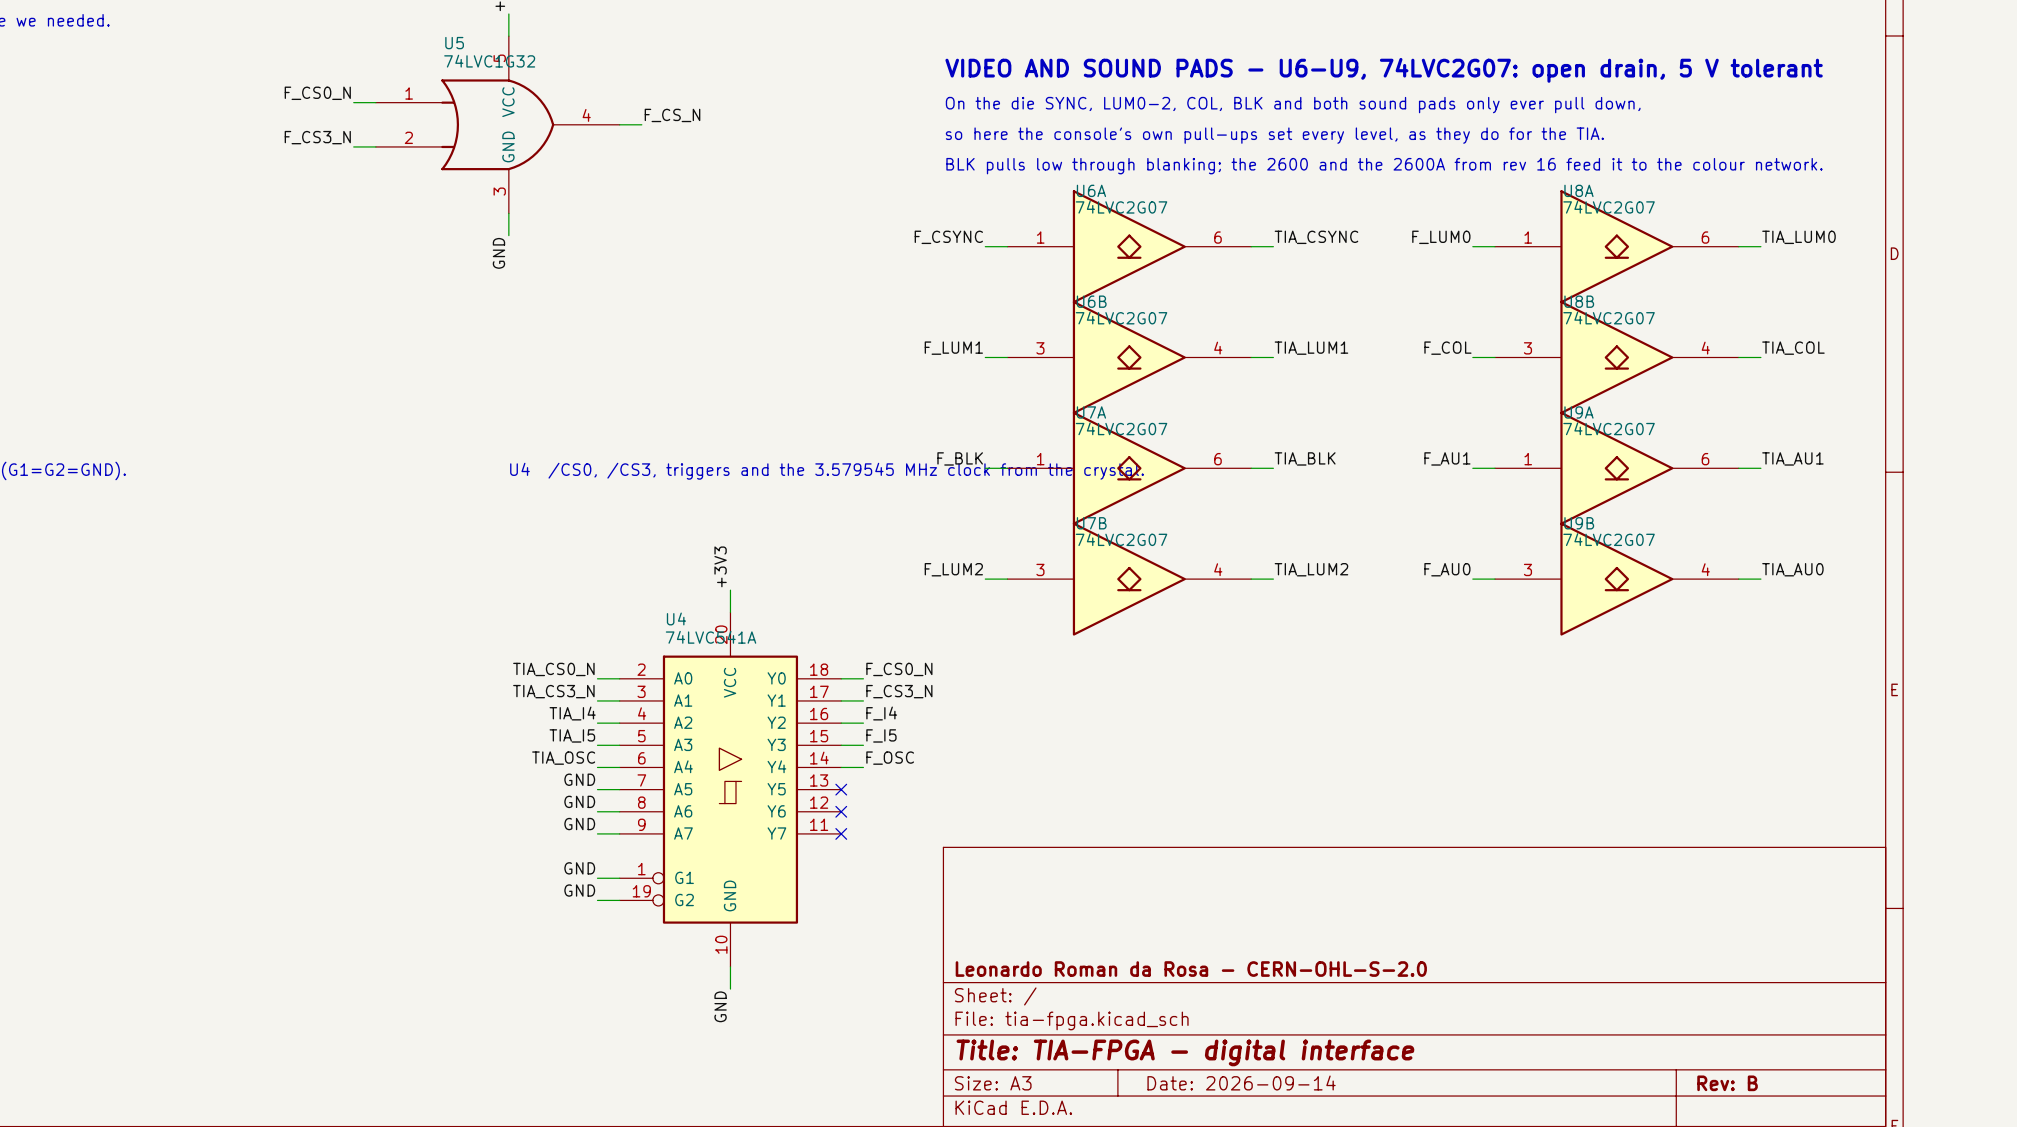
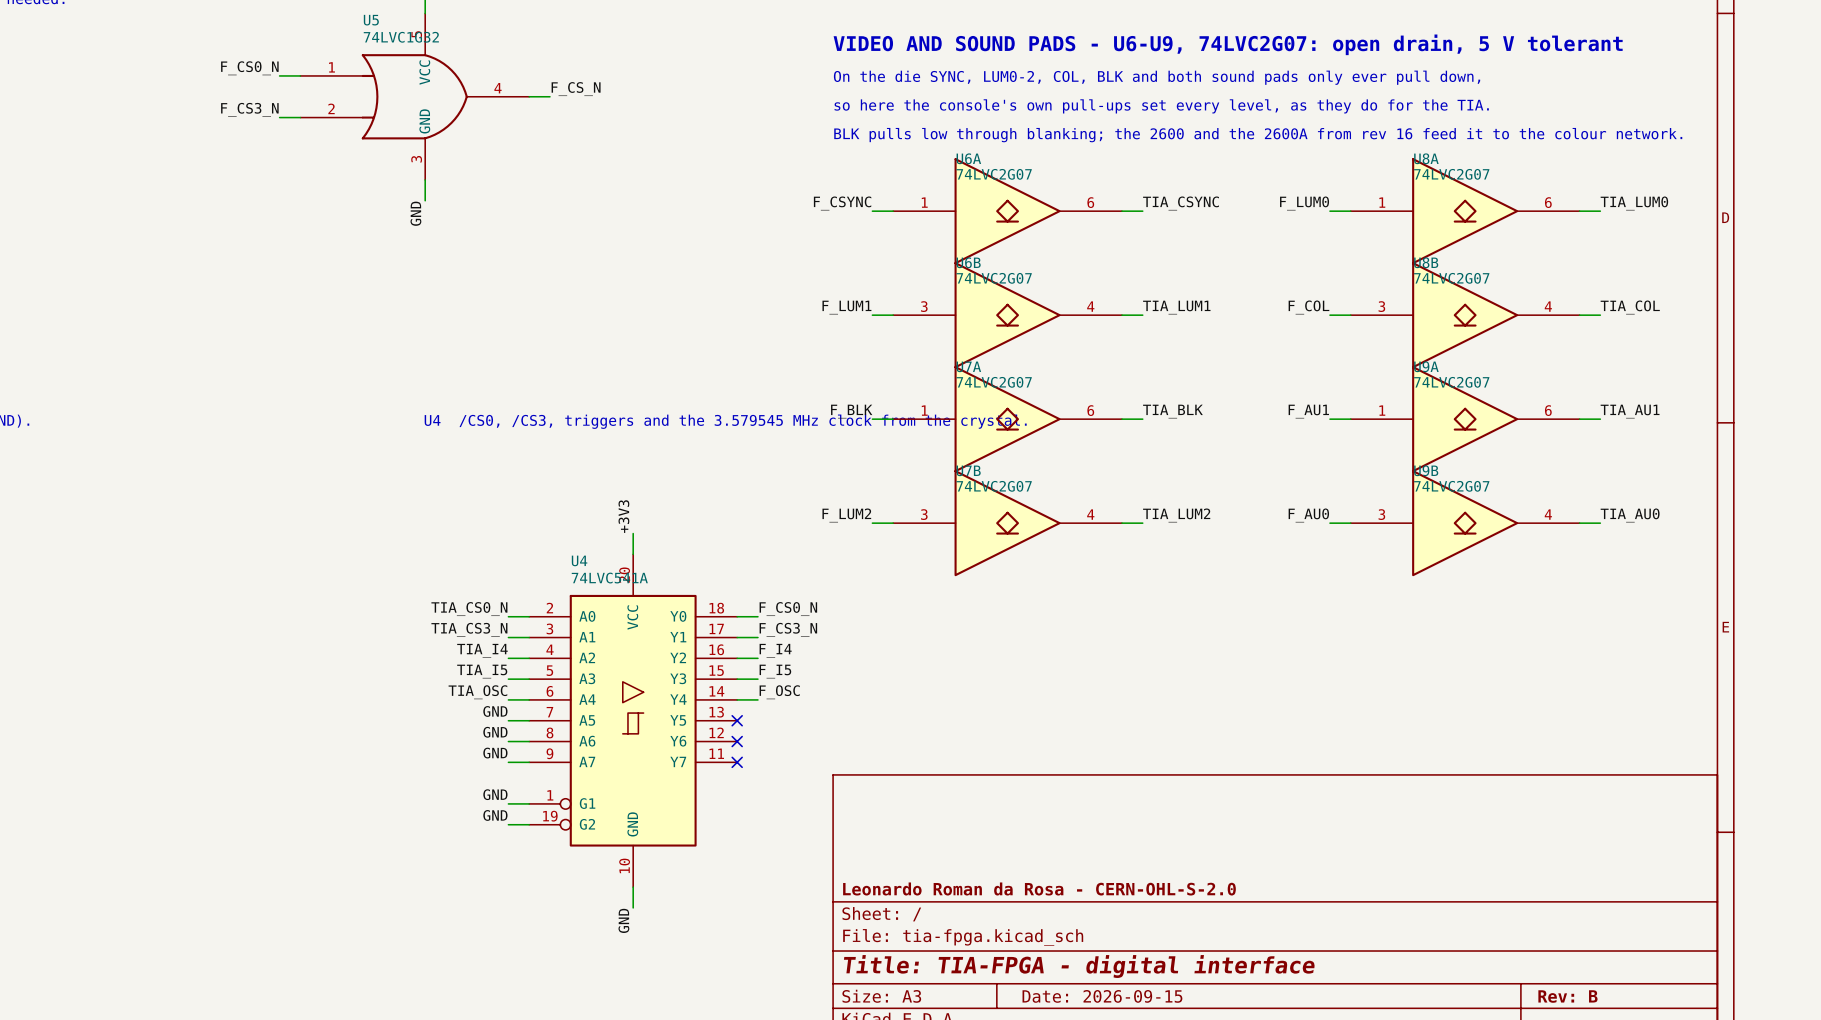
title block: Date: 2026-09-14 (1241, 1083) -> Date: 2026-09-15 (1102, 996)

